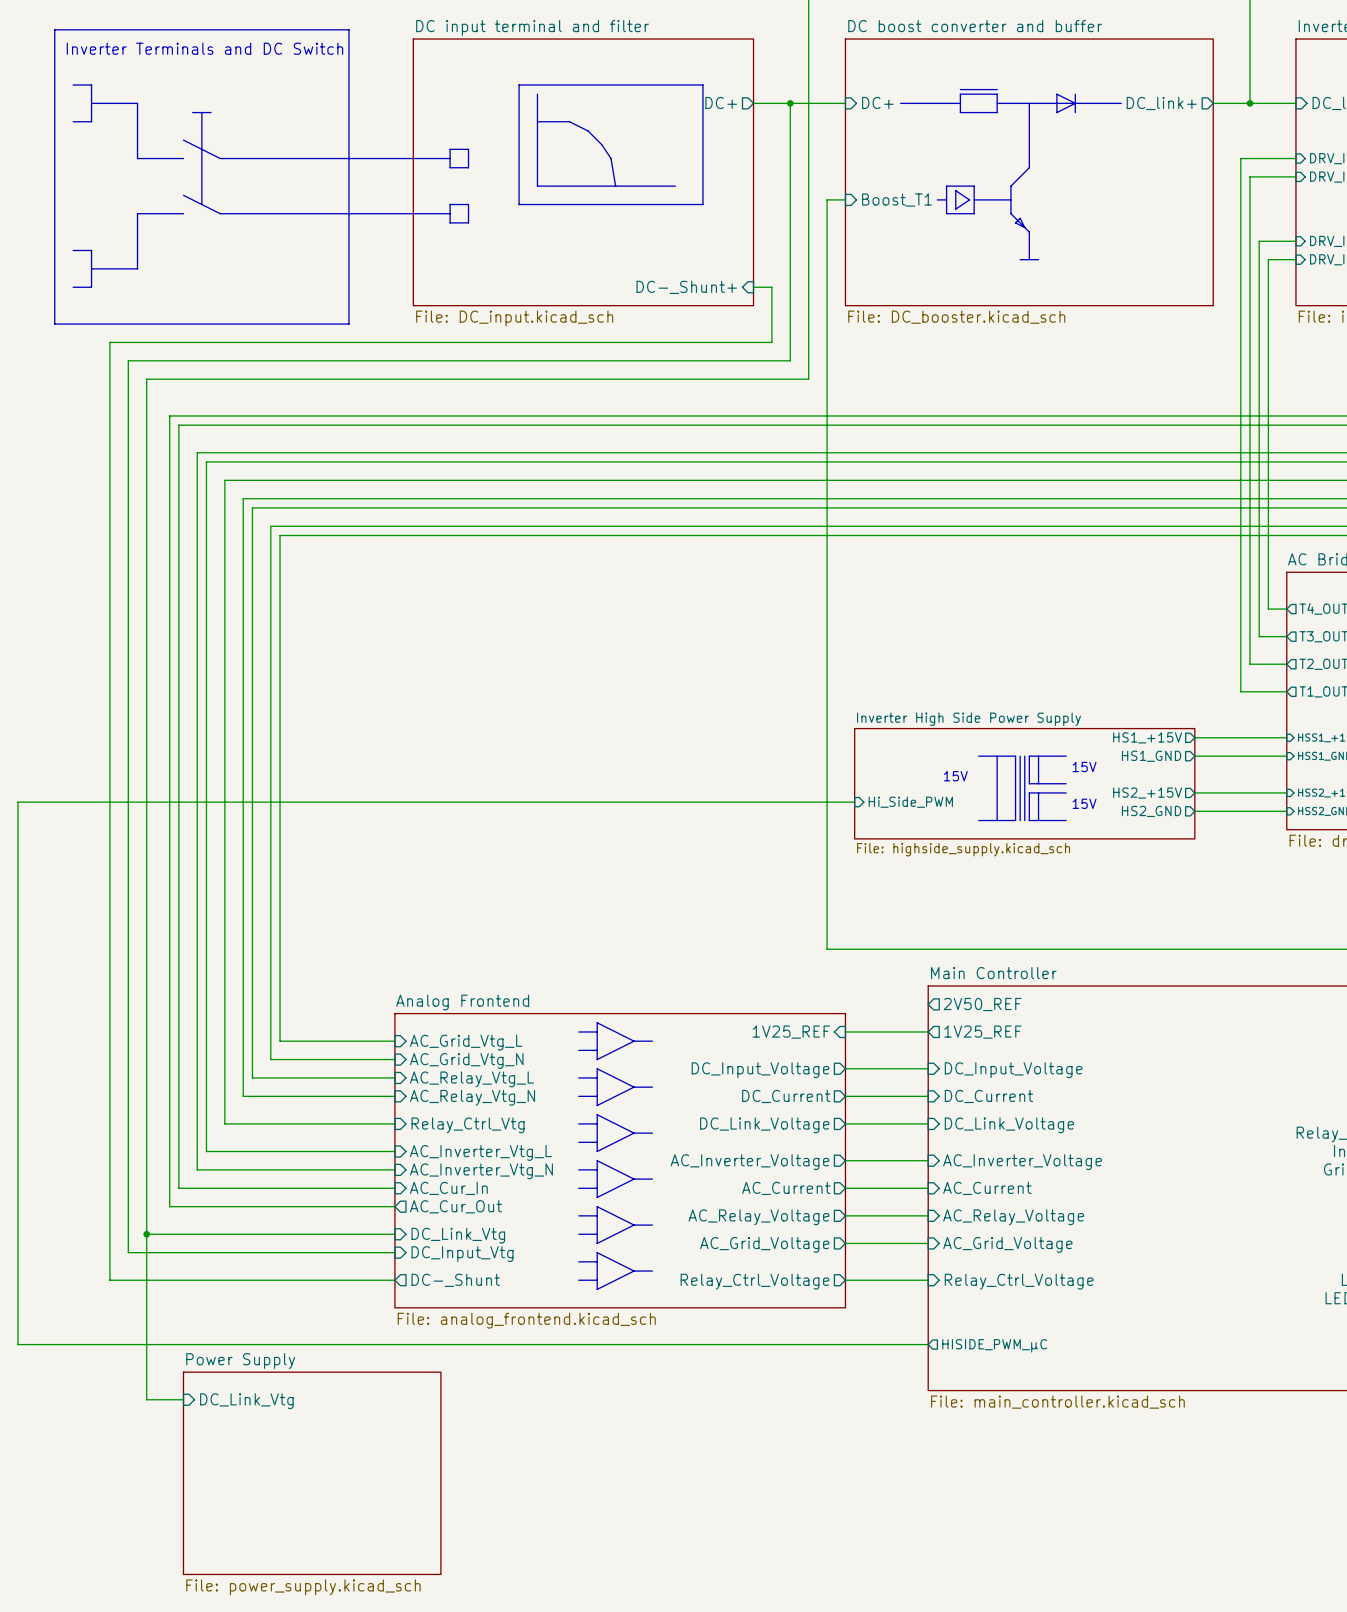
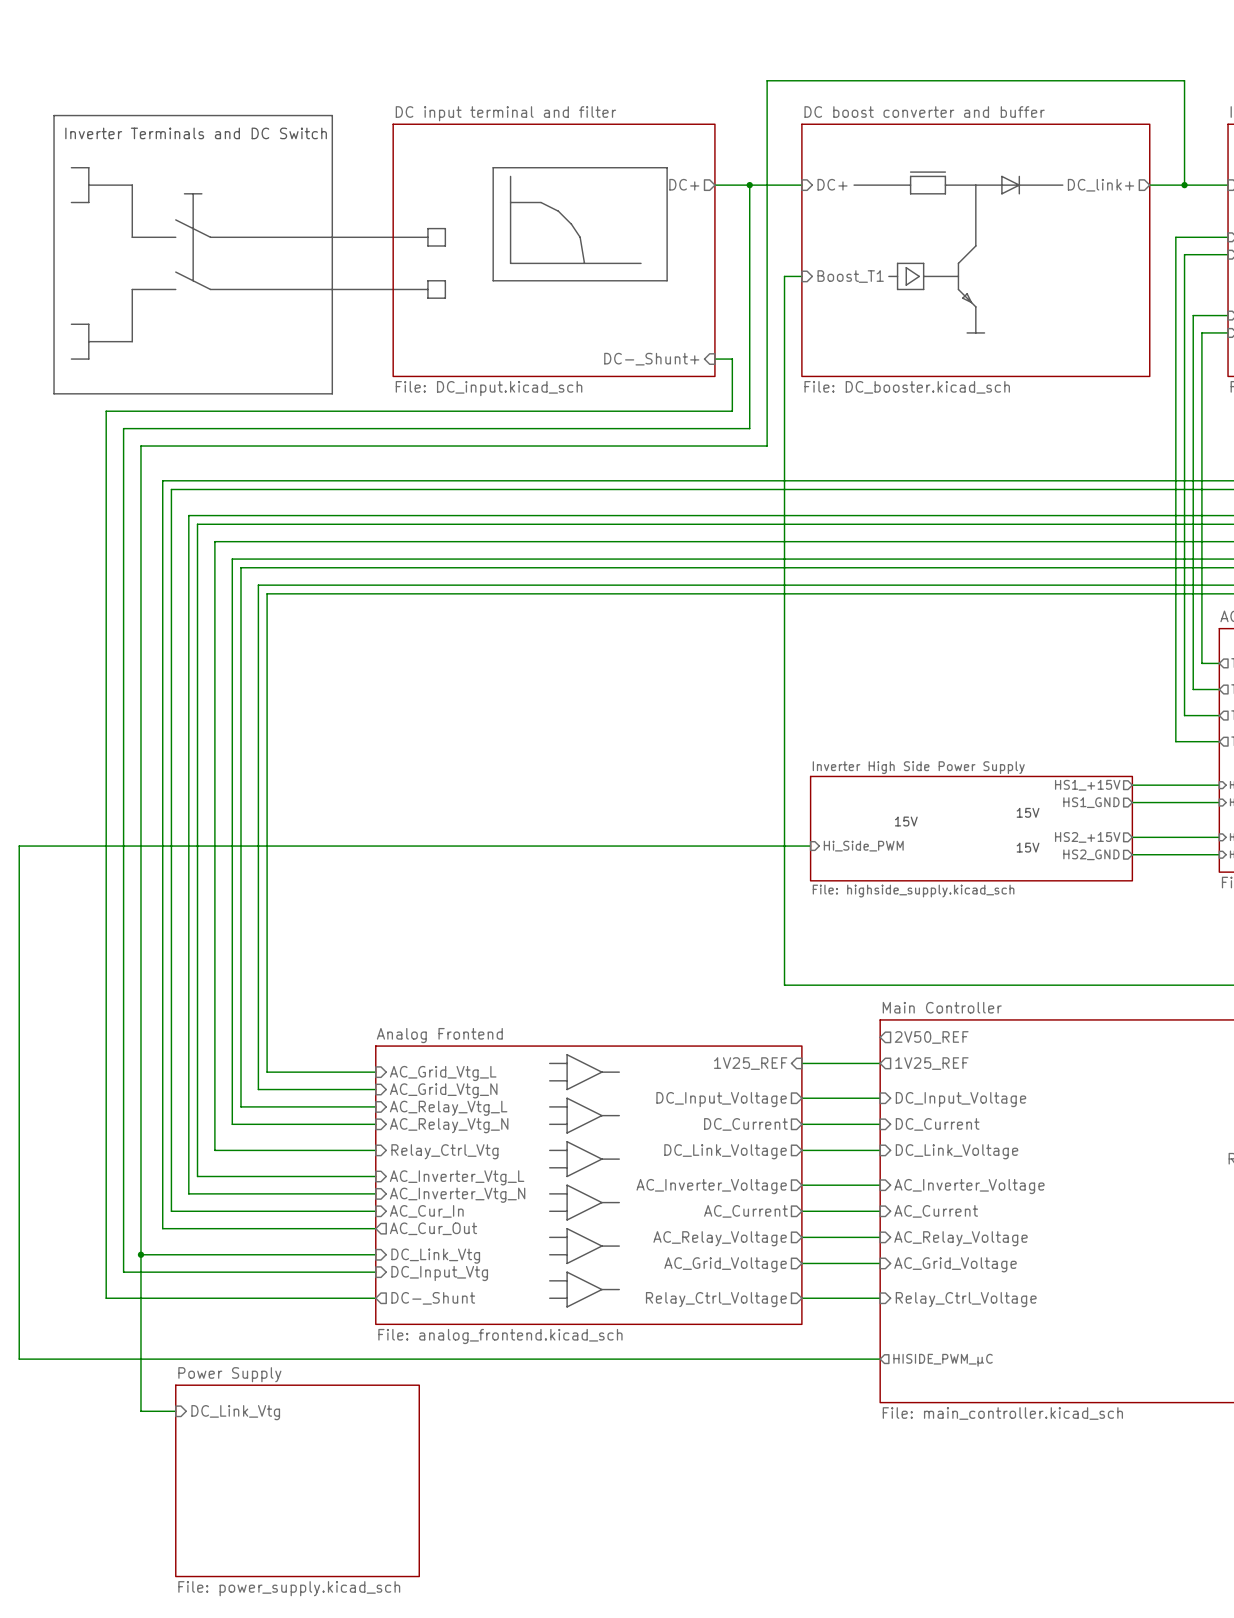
line: (978, 756) (1015, 756) (1015, 820) (978, 820) -> none
line: (997, 756) (997, 820) -> none
line: (1020, 756) (1020, 820) -> none
line: (1024, 756) (1024, 820) -> none
line: (1038, 756) (1038, 783) -> none
line: (1066, 756) (1029, 756) (1029, 783) (1066, 783) -> none
line: (1038, 792) (1038, 820) -> none
line: (1066, 792) (1029, 792) (1029, 820) (1066, 820) -> none

